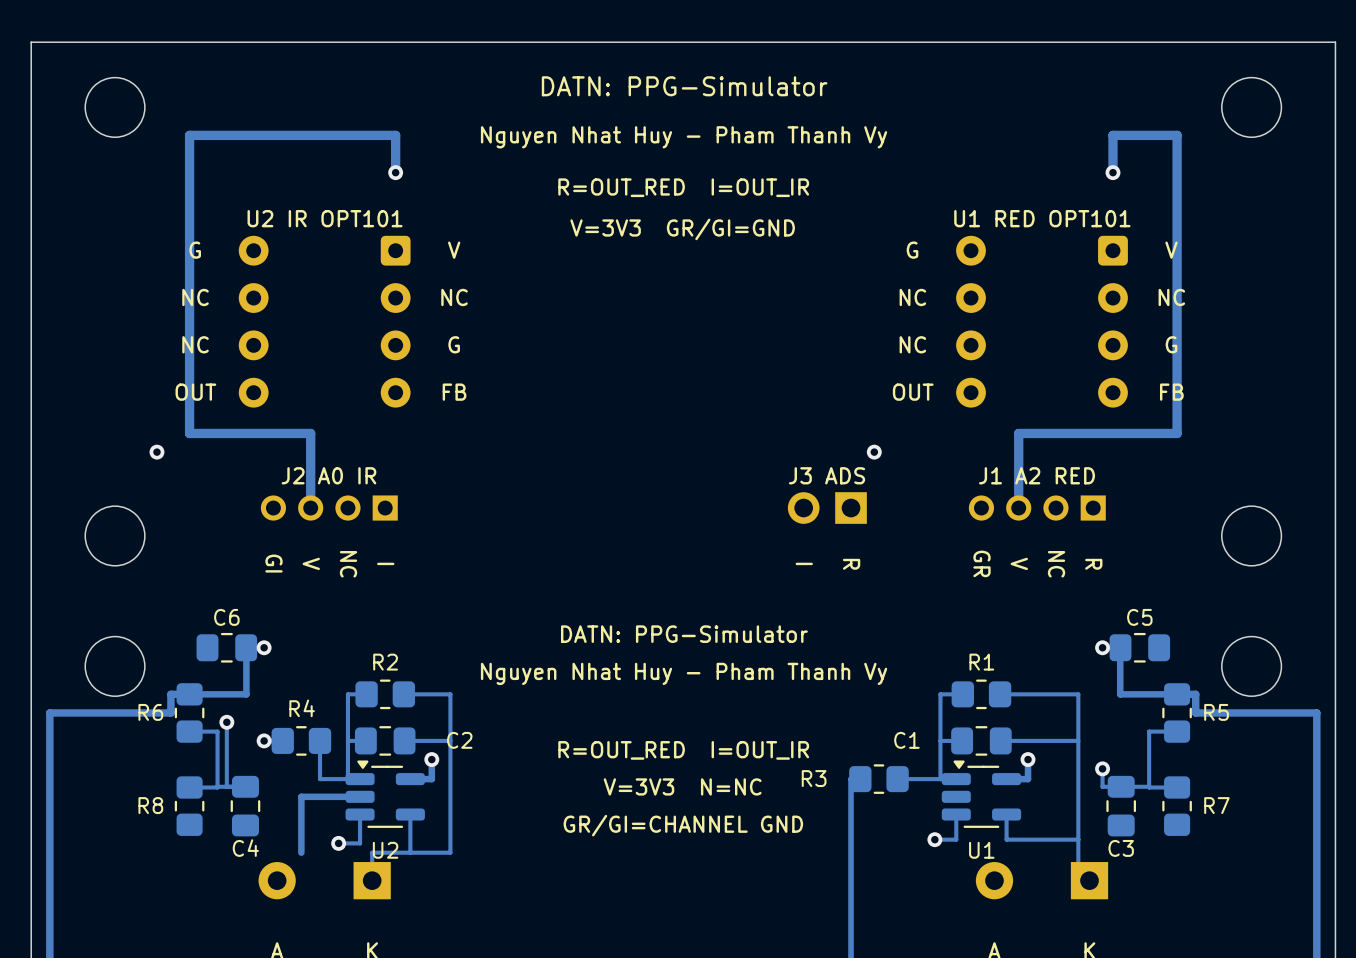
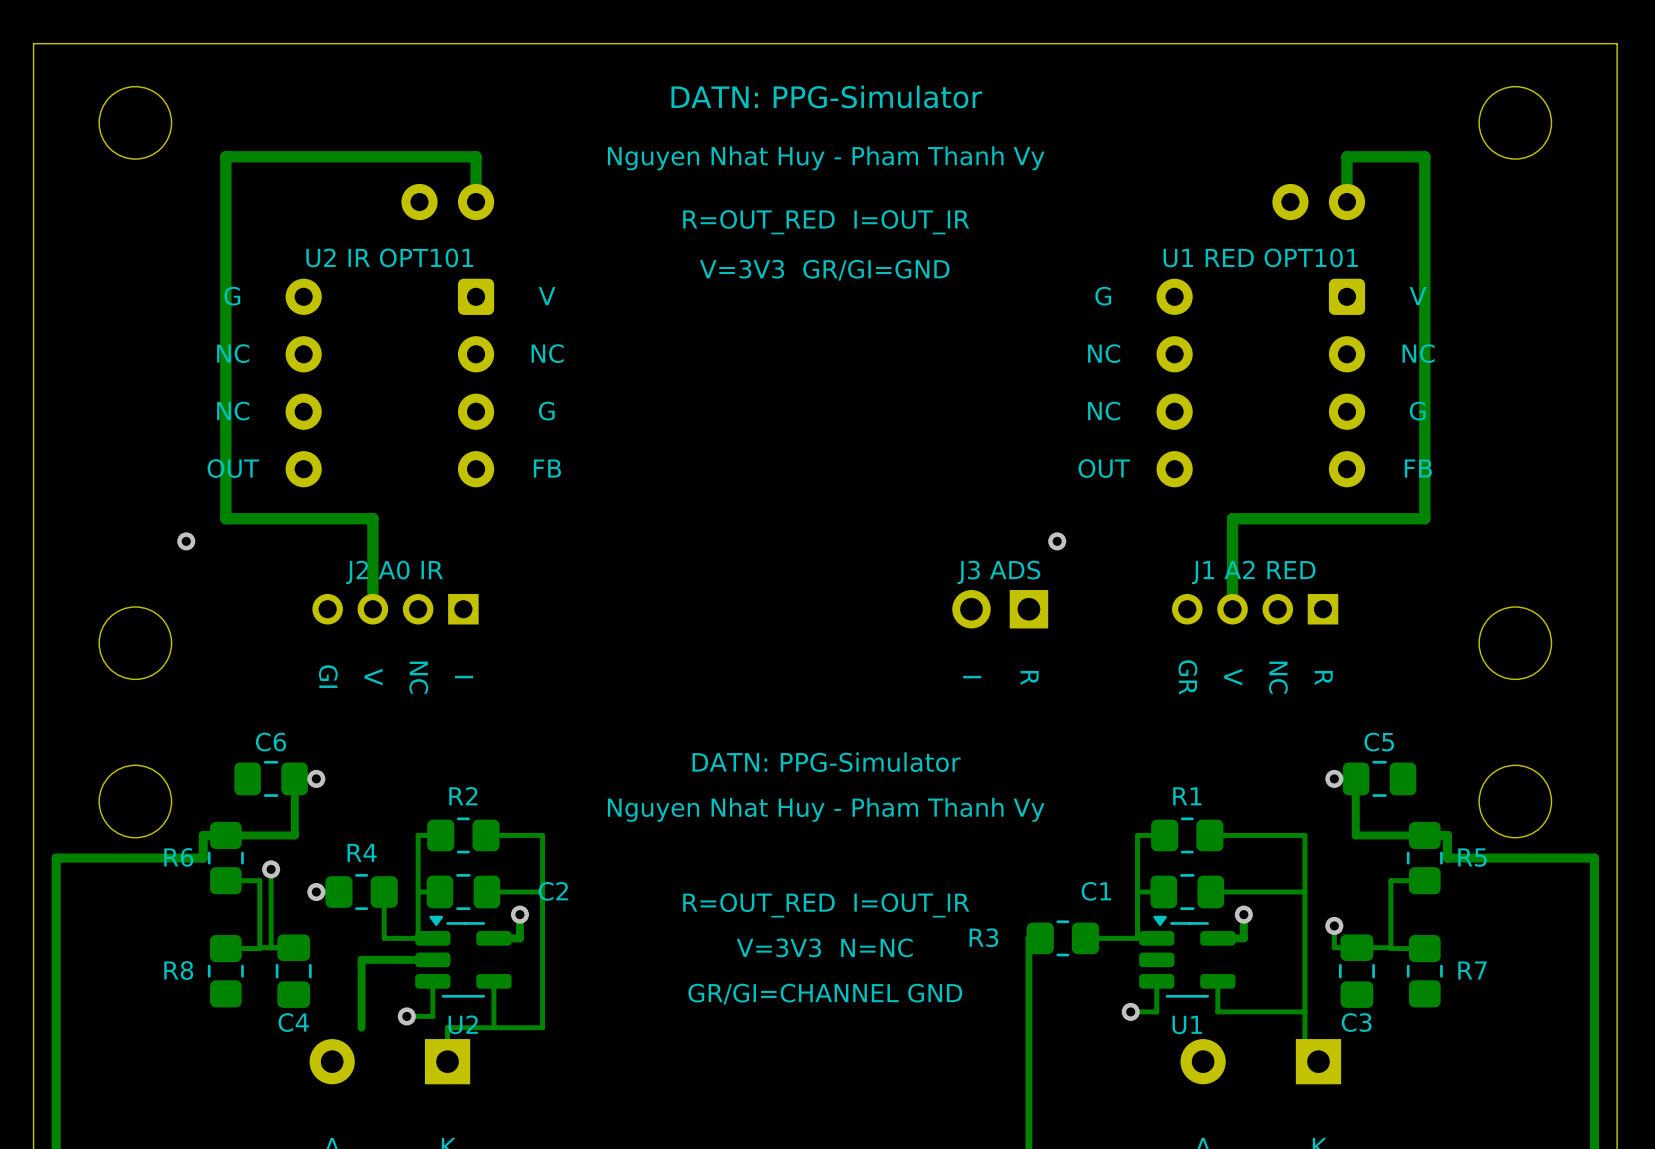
part: none -> (447, 202)
via: (395, 172) -> none
part: none -> (1318, 202)
via: (1112, 172) -> none

